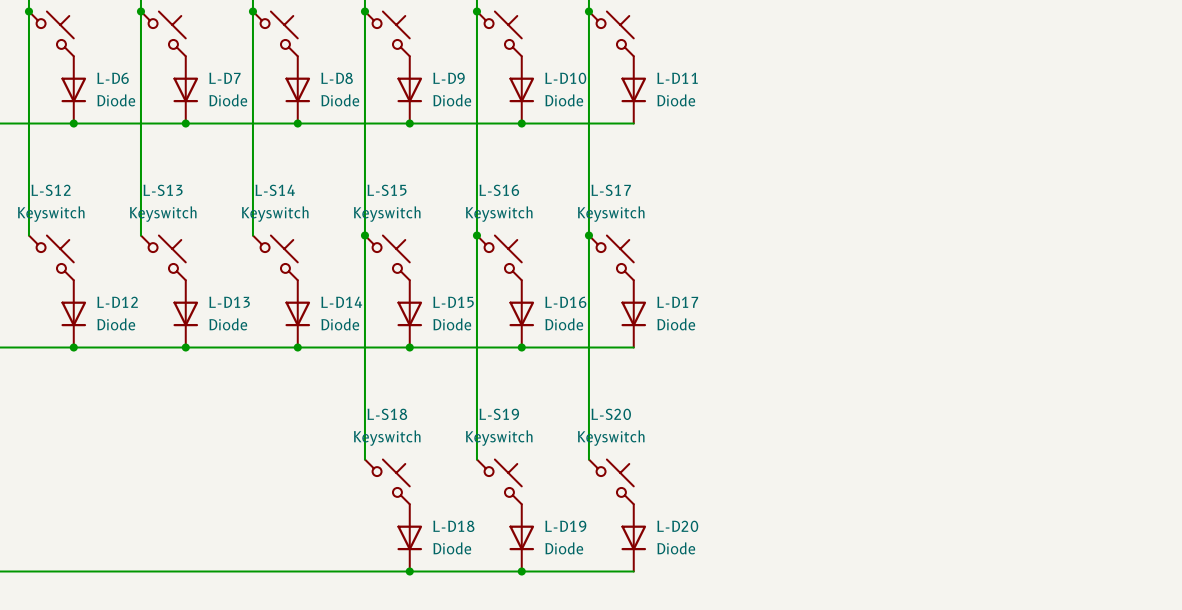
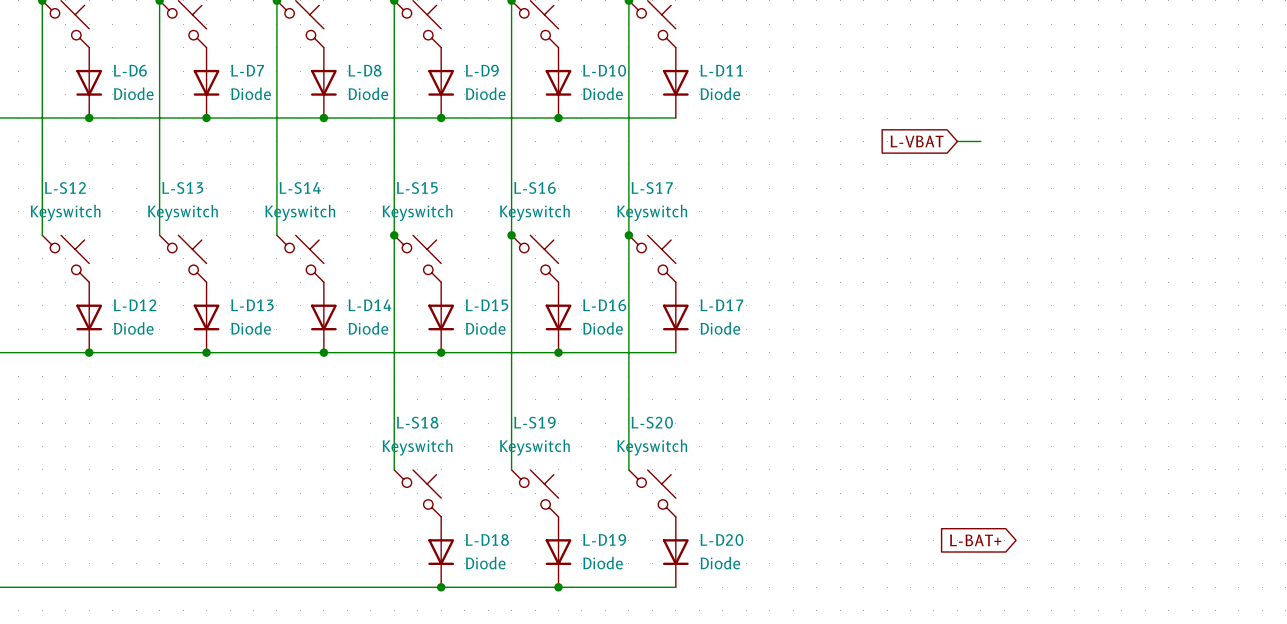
global label: none -> L-VBAT (917, 141)
wire: none -> (957, 141) (980, 141)
global label: none -> L-BAT+ (975, 540)

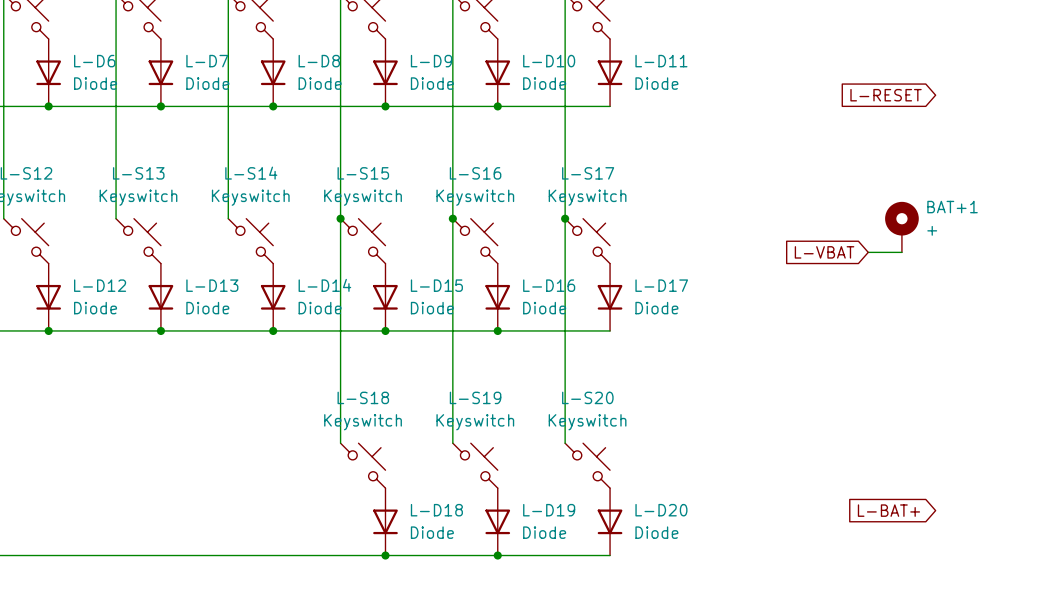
global label: none -> L-RESET (886, 95)
global label position: L-VBAT (917, 141) -> L-VBAT (824, 252)
wire: (957, 141) (980, 141) -> none
BAT+1: none -> + (901, 227)
wire: none -> (868, 252) (901, 252)

